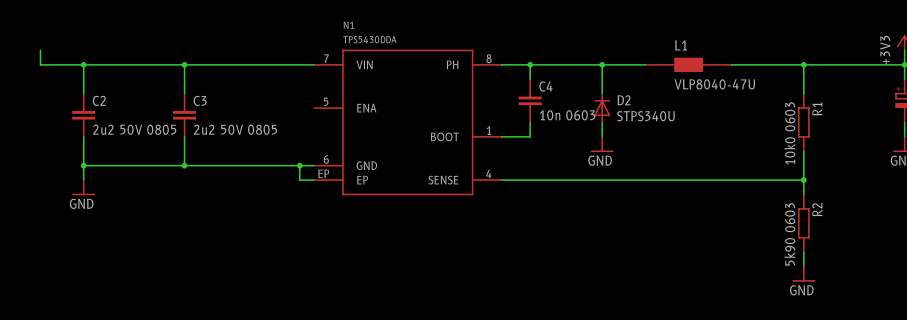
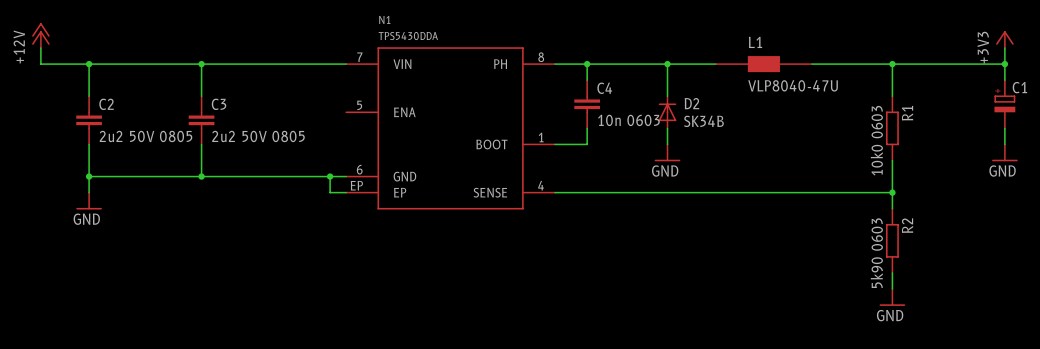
power symbol: none -> +12V (40, 35)
D2 value: STPS340U (645, 116) -> SK34B (703, 121)

